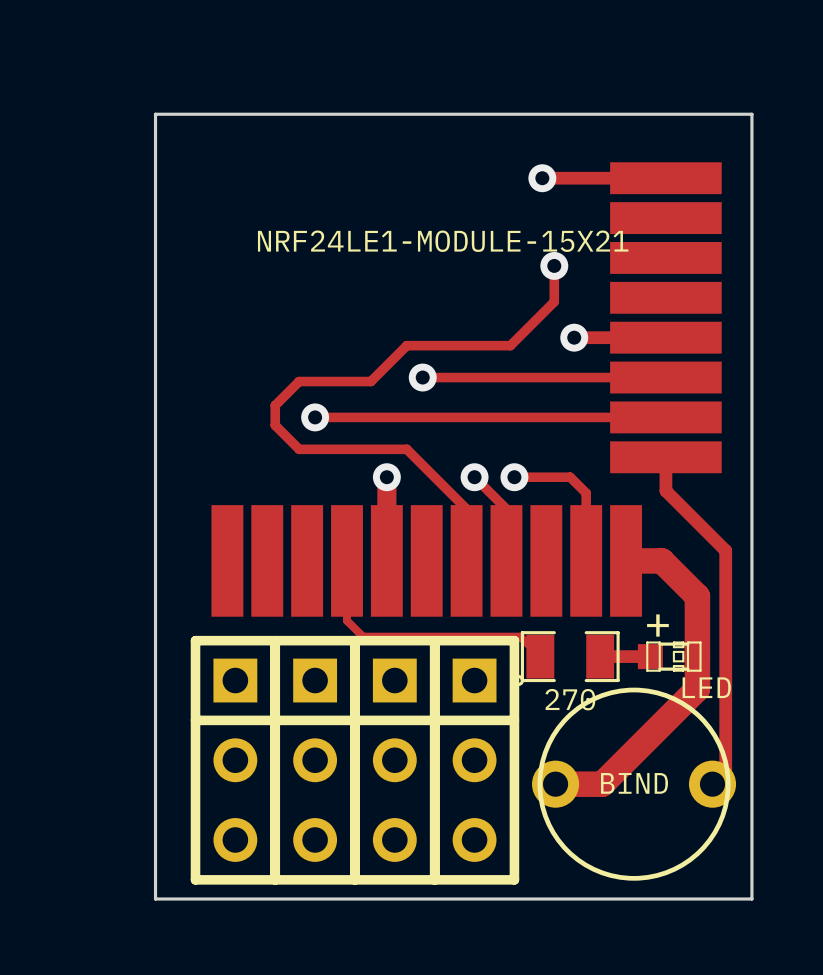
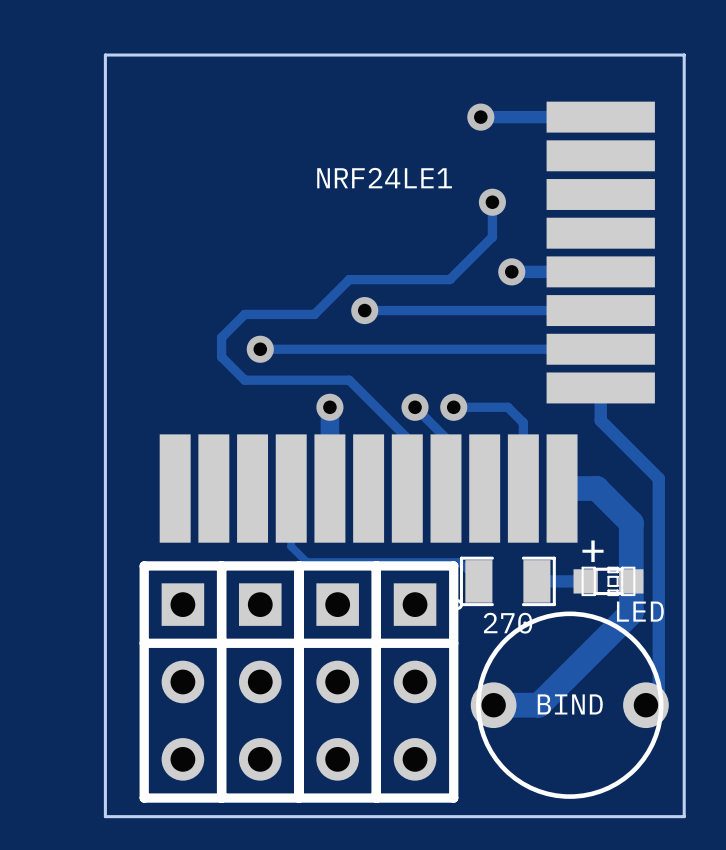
part value: NRF24LE1-MODULE-15X21 (443, 241) -> NRF24LE1 (384, 178)

